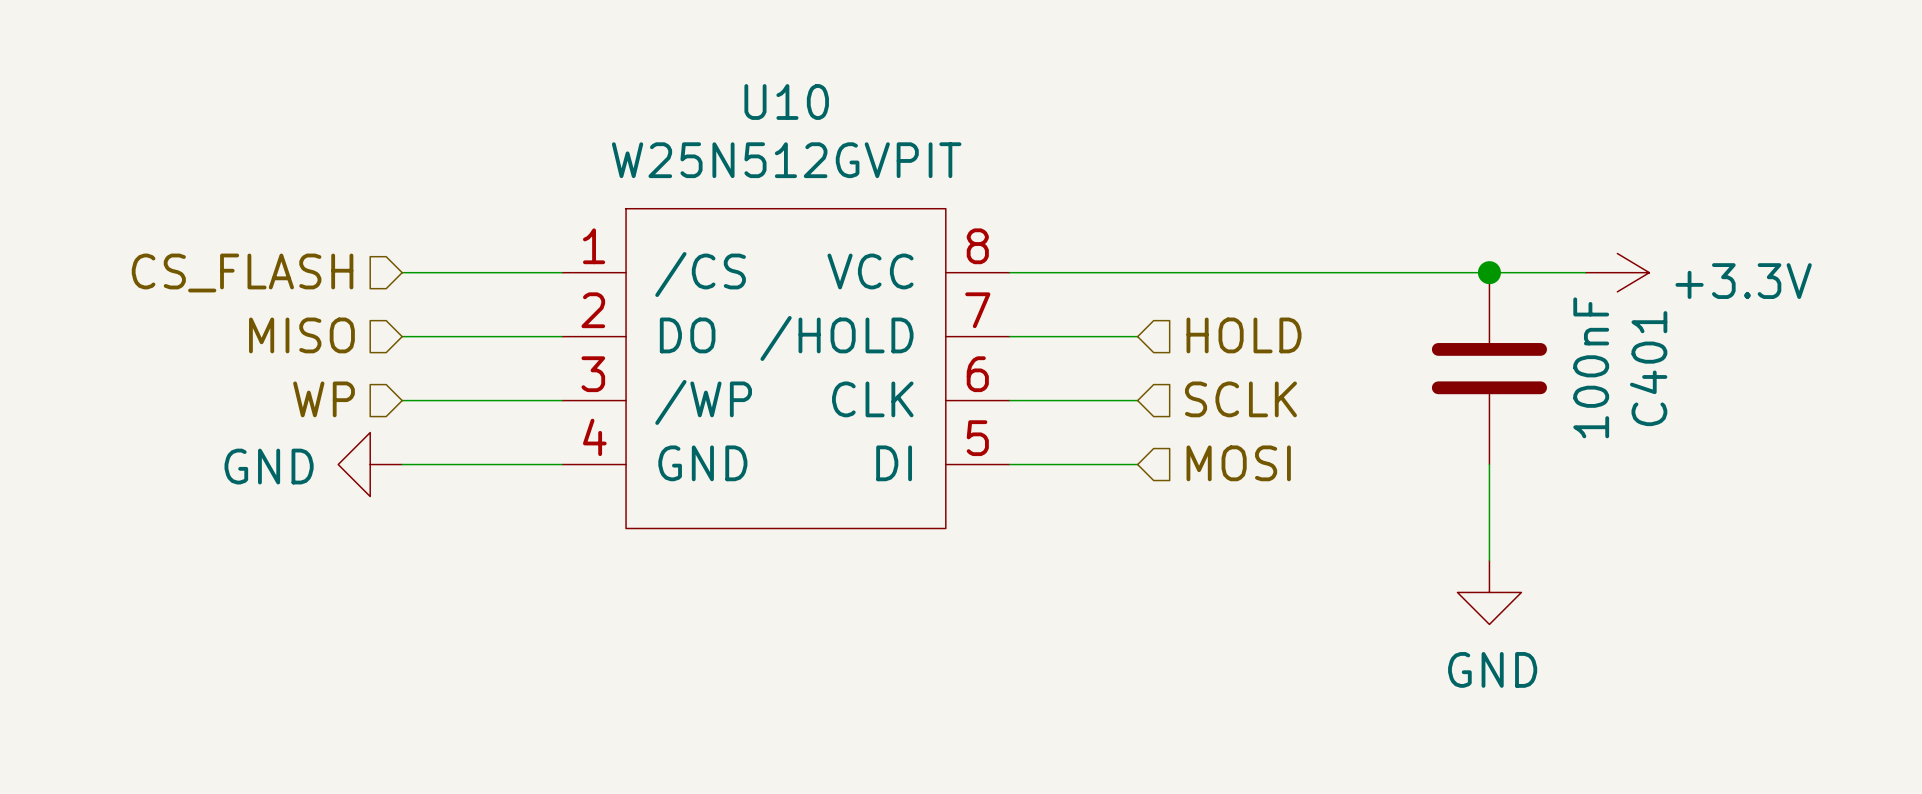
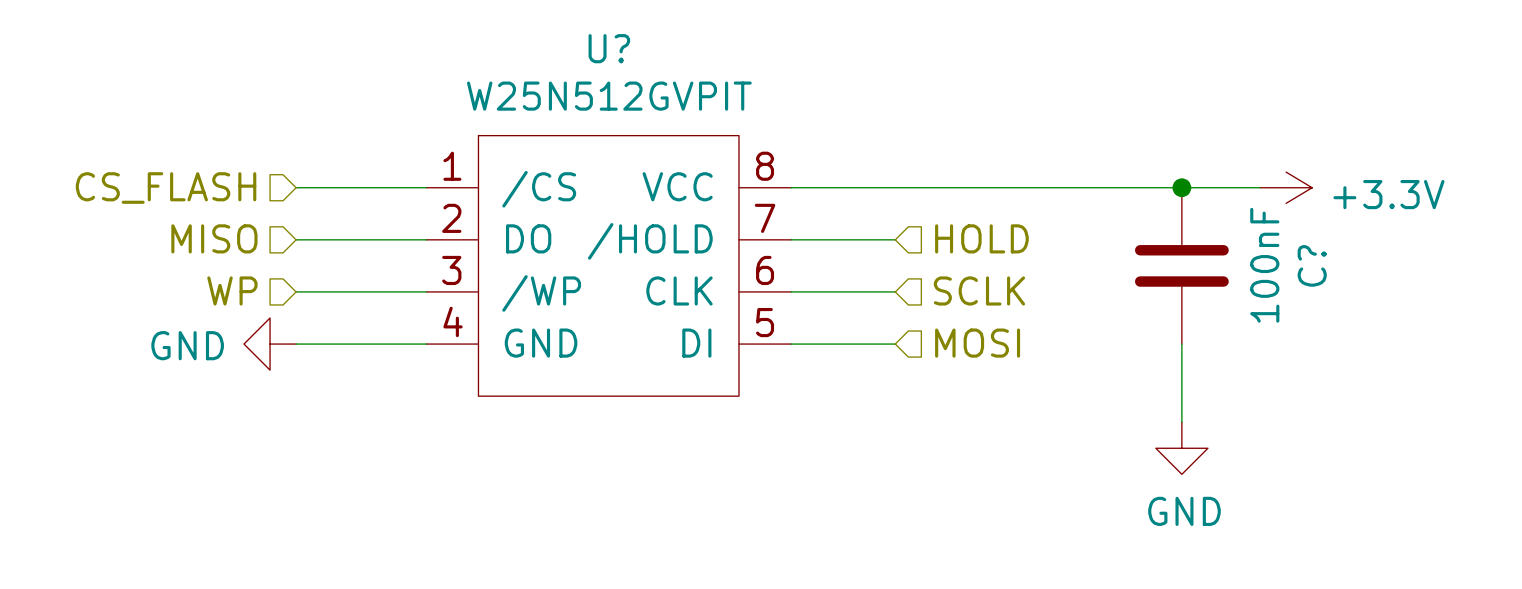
U10 name: U10 (786, 101) -> U? (609, 48)
C401 name: C401 (1648, 368) -> C? (1312, 265)

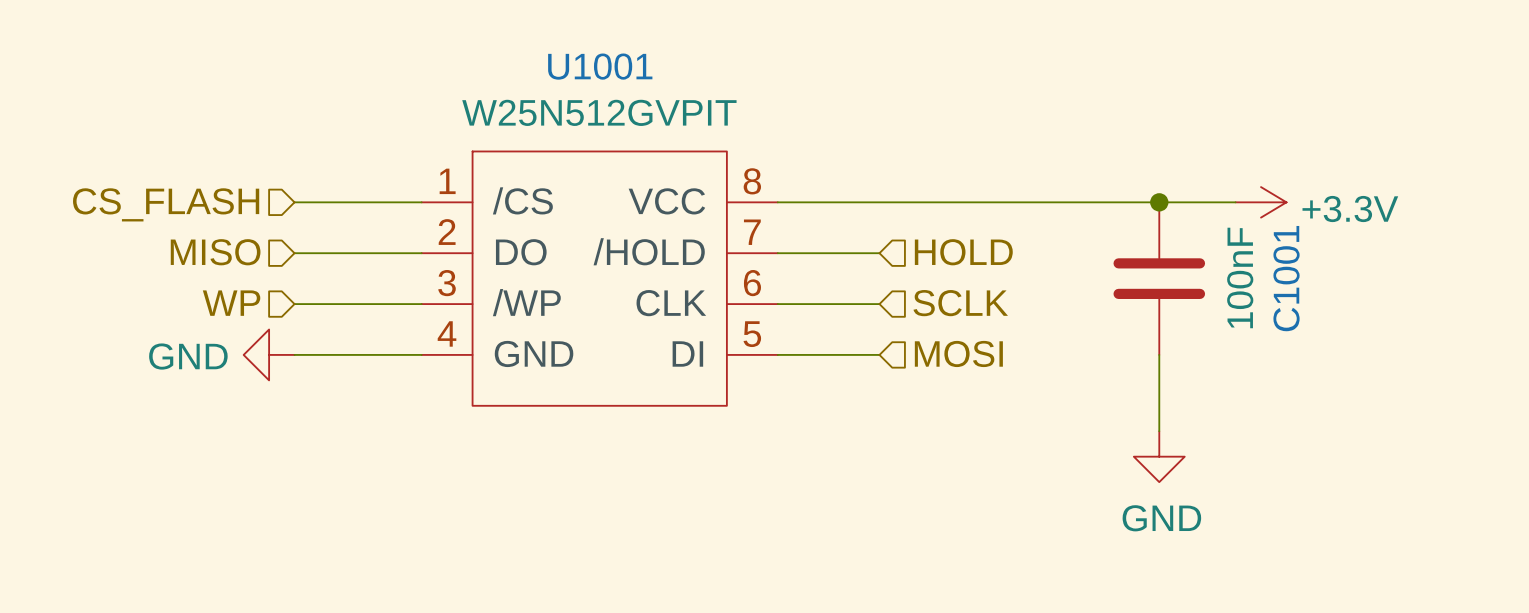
U? name: U? (609, 48) -> U1001 (600, 66)
C? name: C? (1312, 265) -> C1001 (1286, 278)

